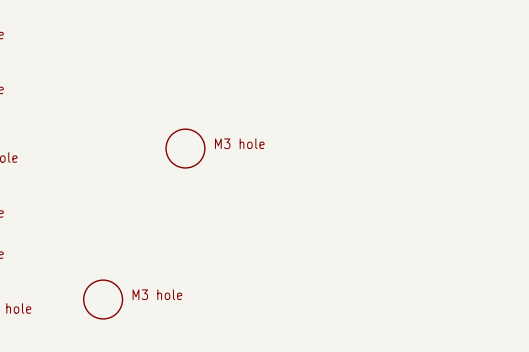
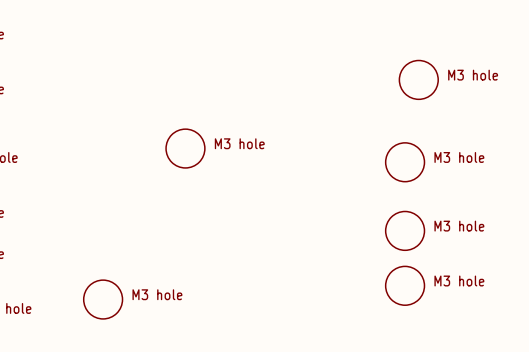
part: none -> (418, 79)
part: none -> (405, 162)
part: none -> (405, 230)
part: none -> (405, 285)

